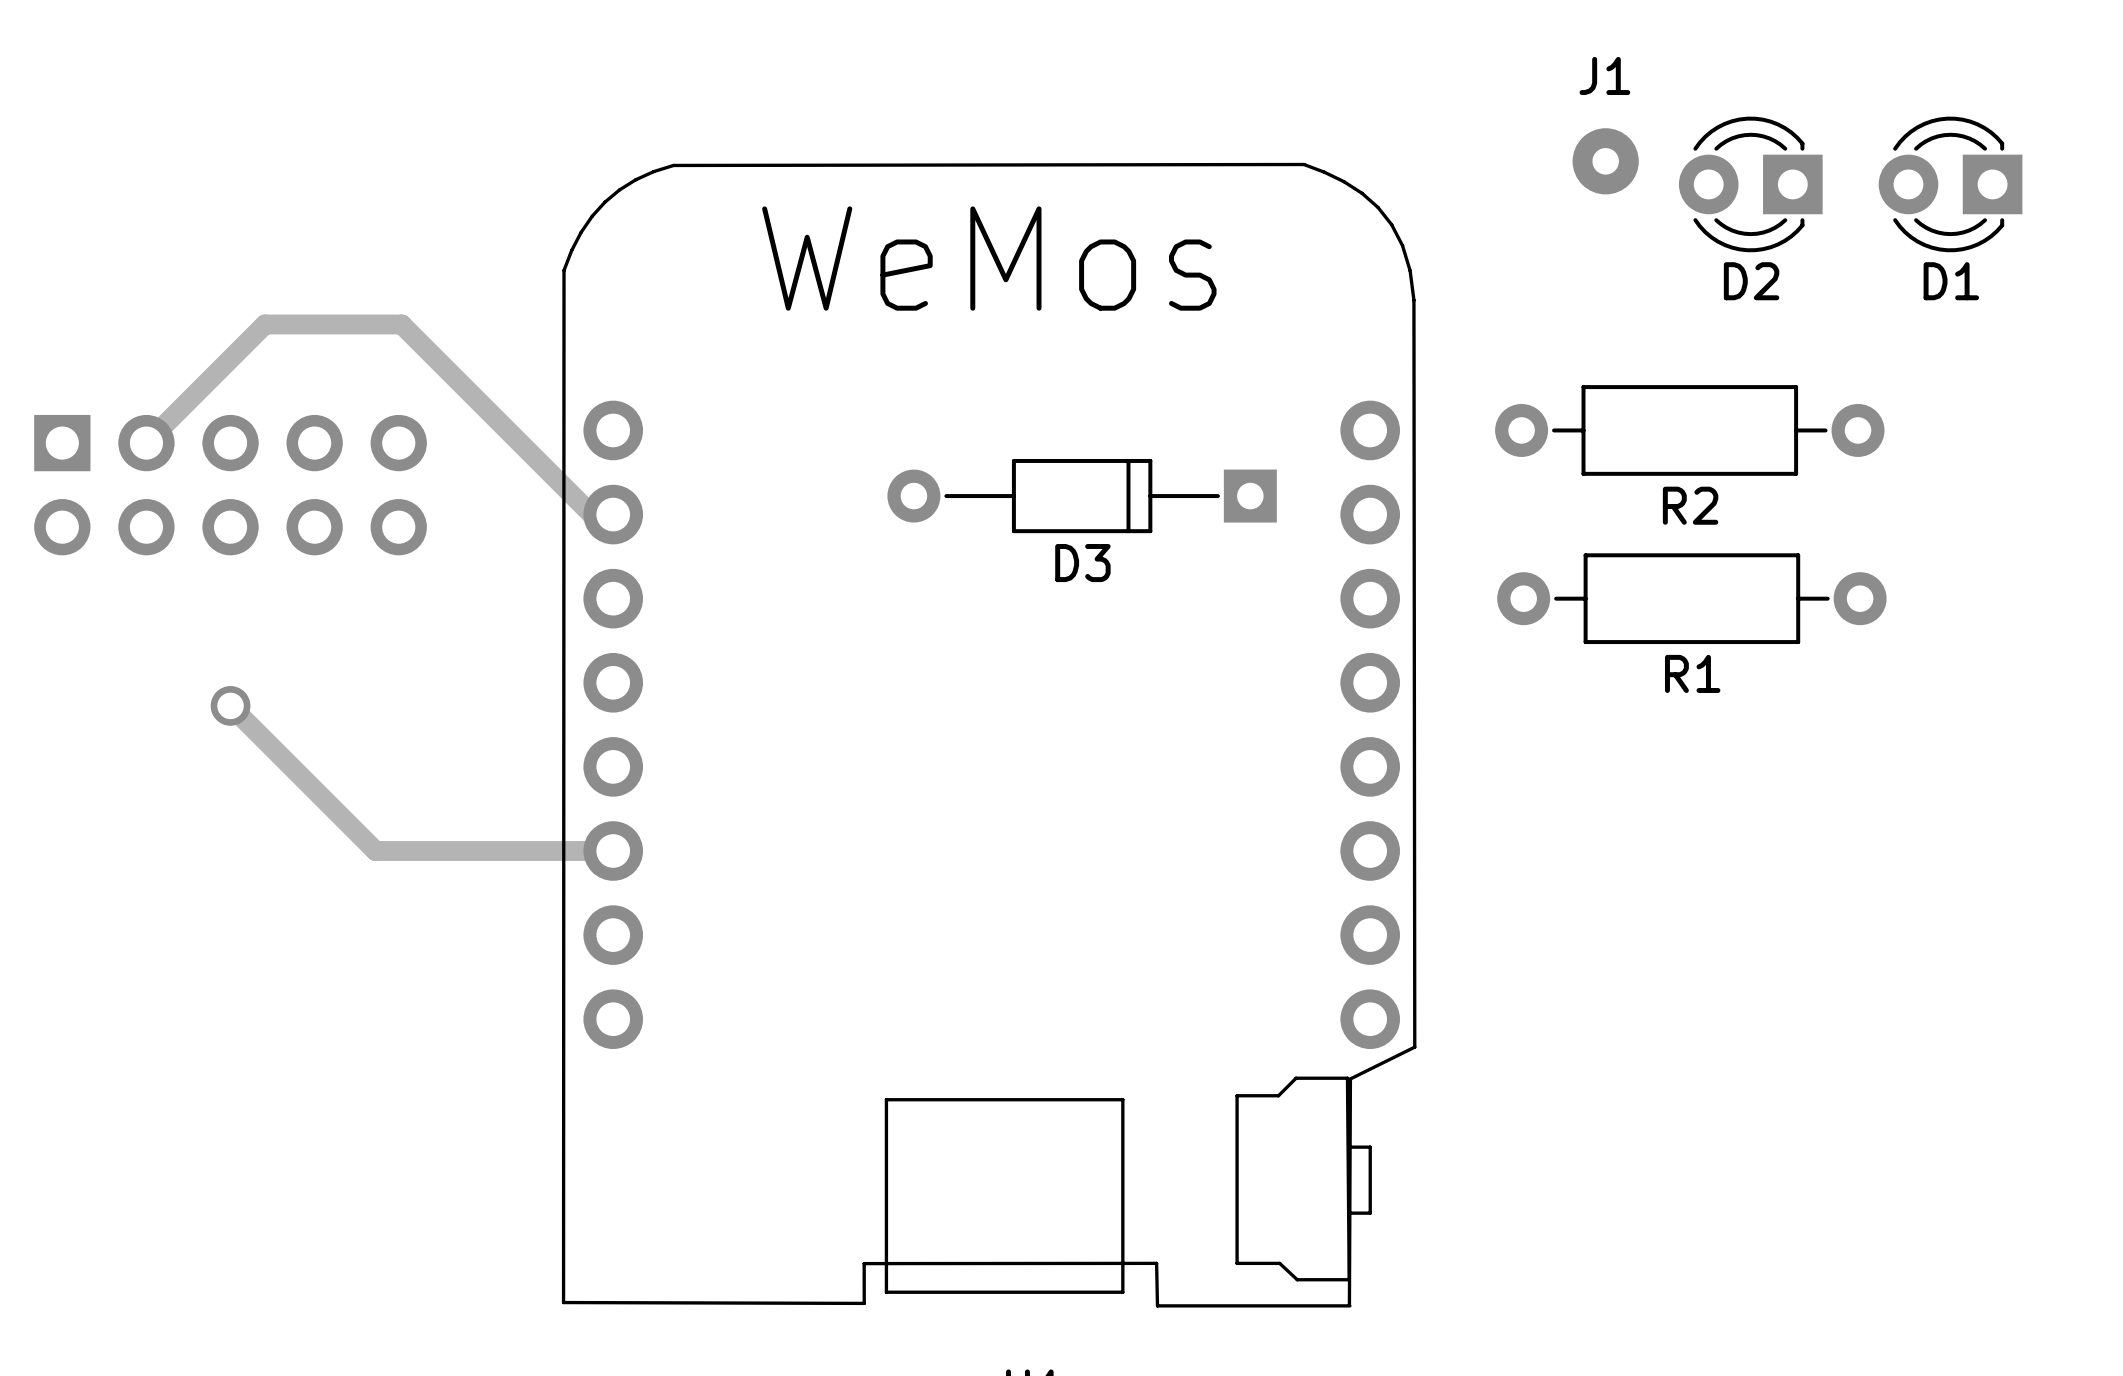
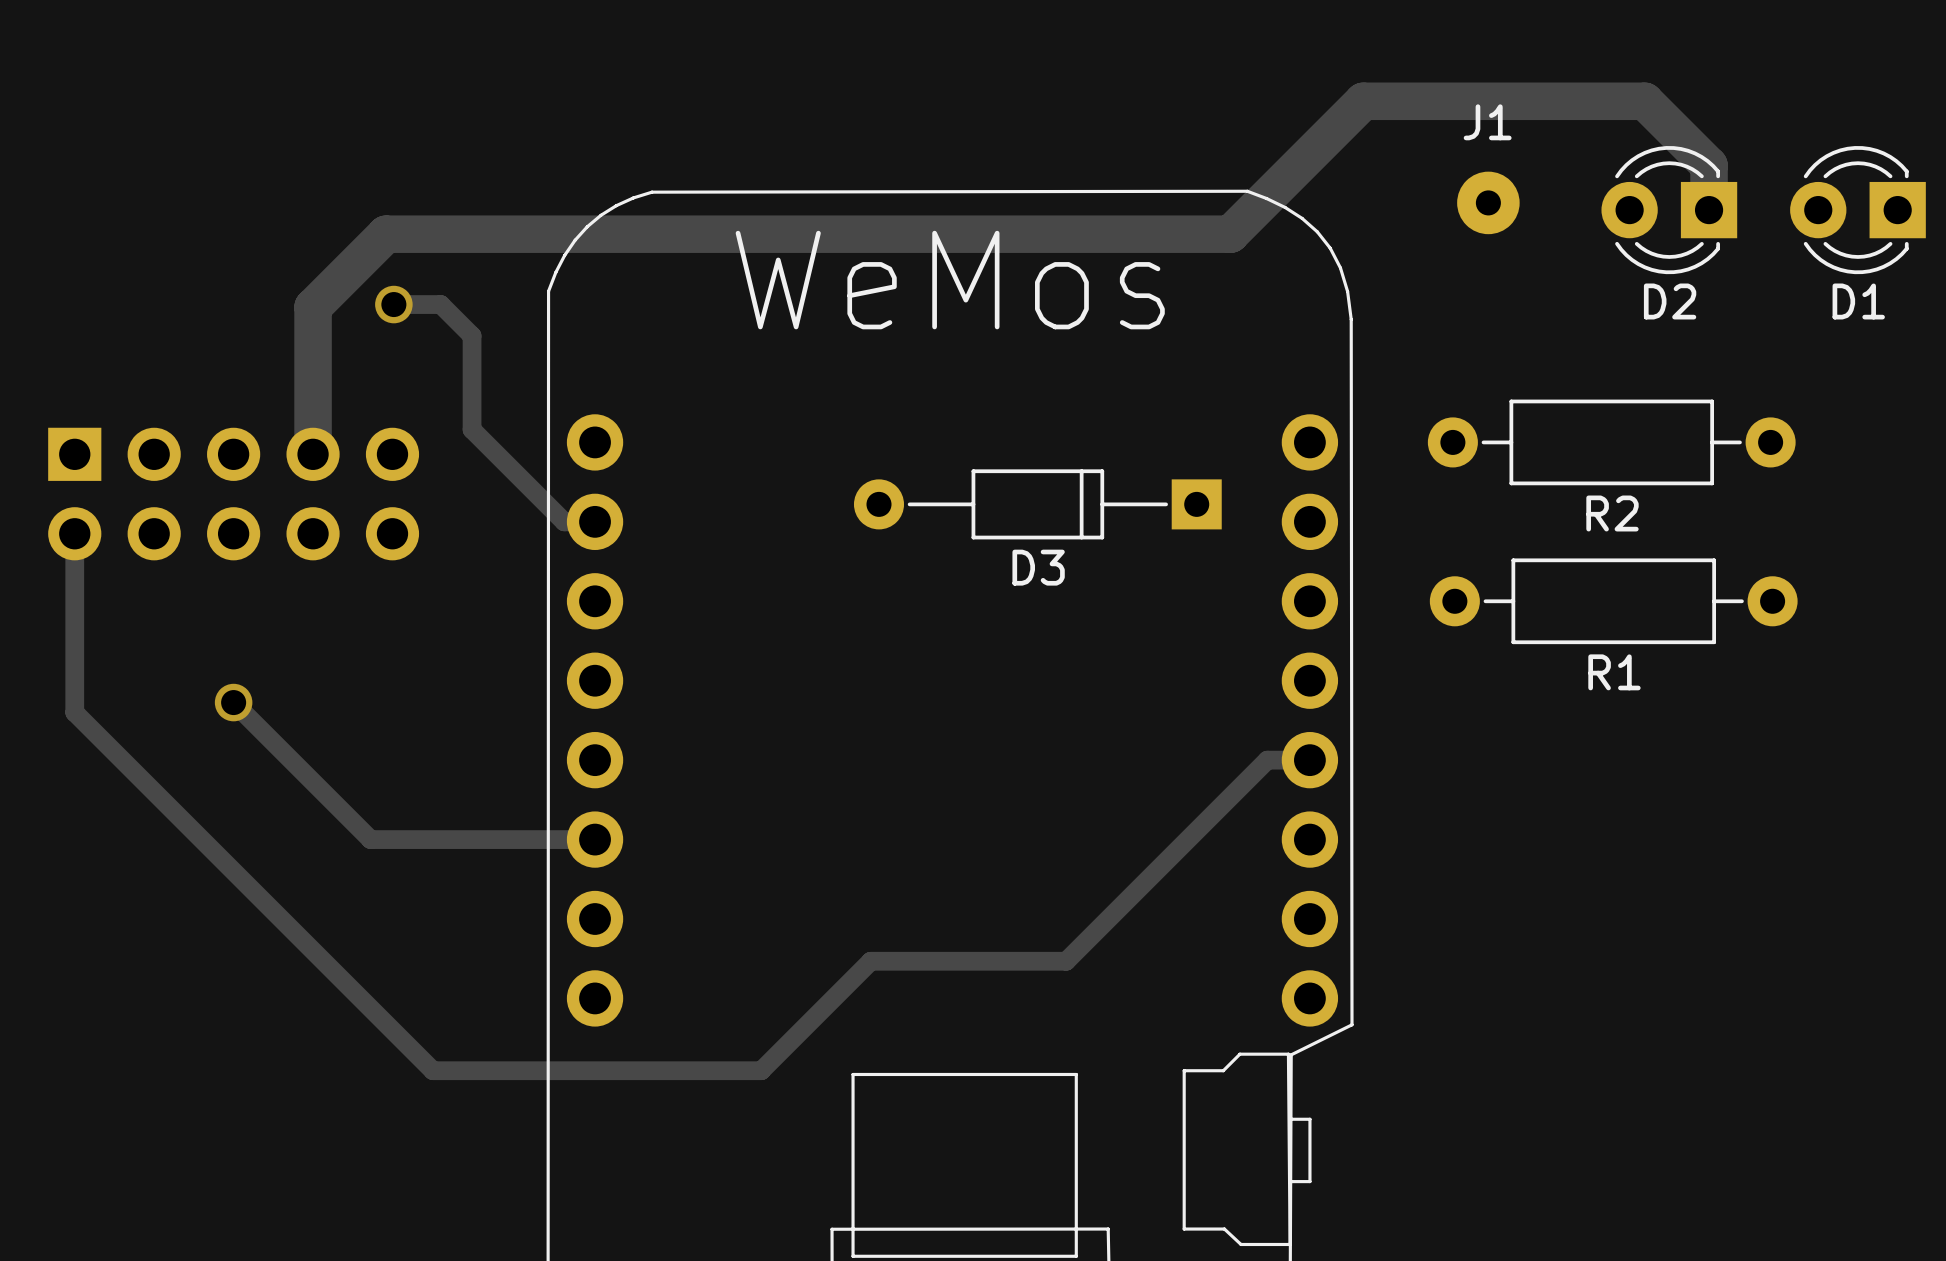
J1 position: (1605, 161) -> (1488, 202)
track: none -> (1709, 210) (1709, 165) (1644, 101) (1363, 101) (1230, 234) (386, 234) (313, 307) (313, 454)
via: none -> (393, 304)
track: (146, 443) (265, 324) (401, 324) (591, 514) -> (393, 304) (440, 304) (472, 335) (472, 429) (564, 521) (574, 521)
track: none -> (74, 533) (74, 712) (432, 1070) (761, 1070) (870, 961) (1066, 961) (1267, 760) (1309, 760)

